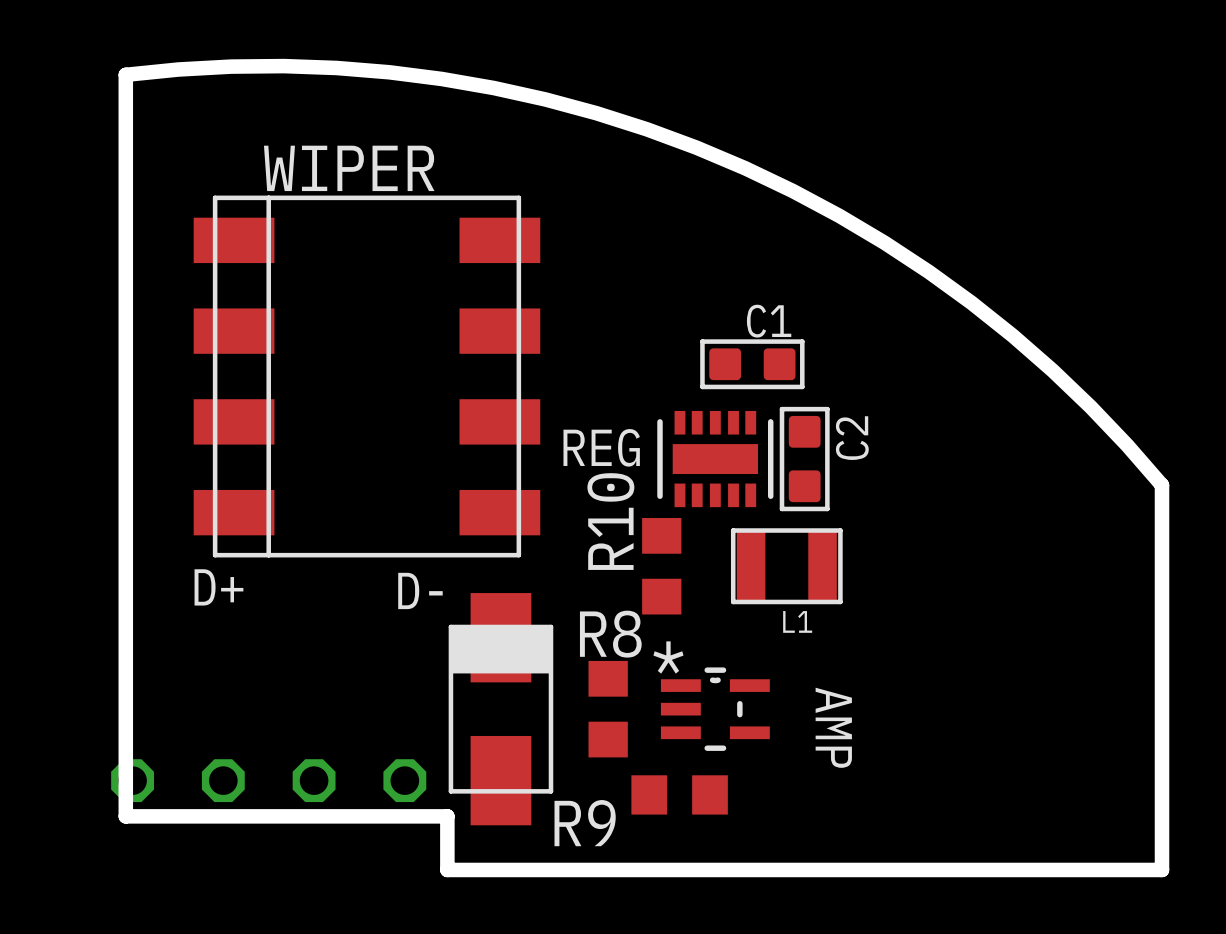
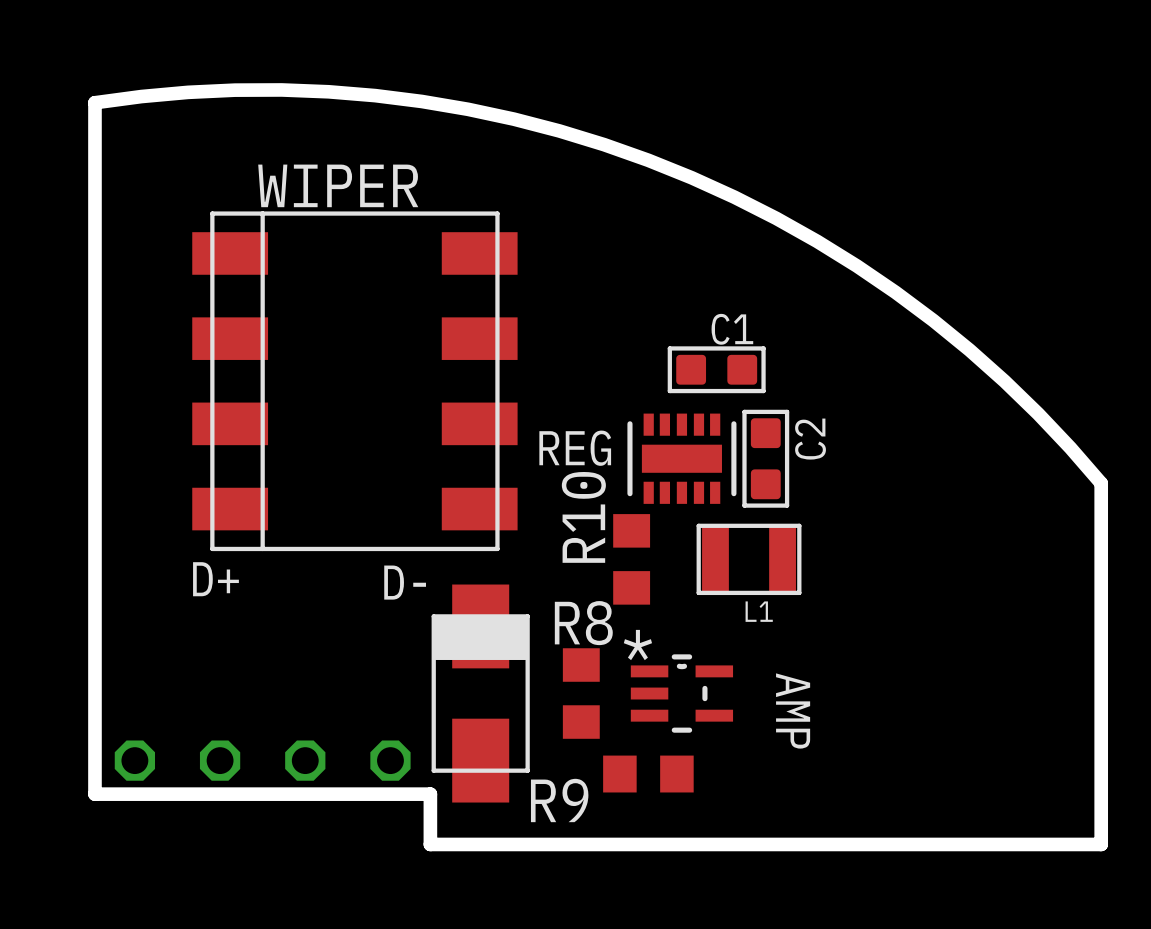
board edge: (1162, 485) (1090, 407) (1052, 370) (1012, 335) (928, 271) (839, 215) (745, 168) (696, 147) (646, 129) (545, 99) (493, 88) (389, 72) (336, 67) (231, 66) (125, 74) (125, 816) -> (1101, 483) (1038, 413) (1004, 381) (969, 350) (895, 292) (856, 266) (776, 218) (734, 197) (648, 160) (604, 144) (513, 119) (468, 109) (375, 95) (281, 89) (234, 90) (188, 92) (94, 102) (94, 794) (128, 794)

